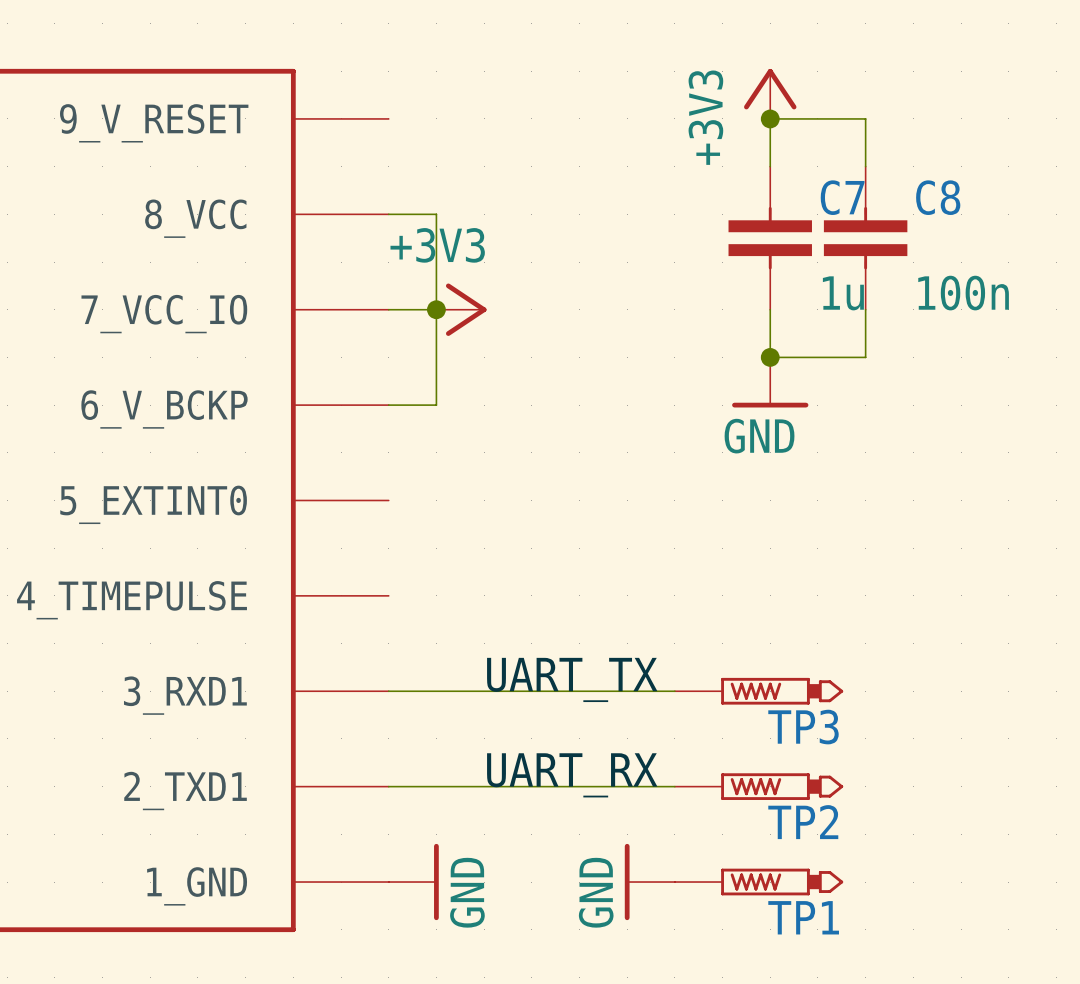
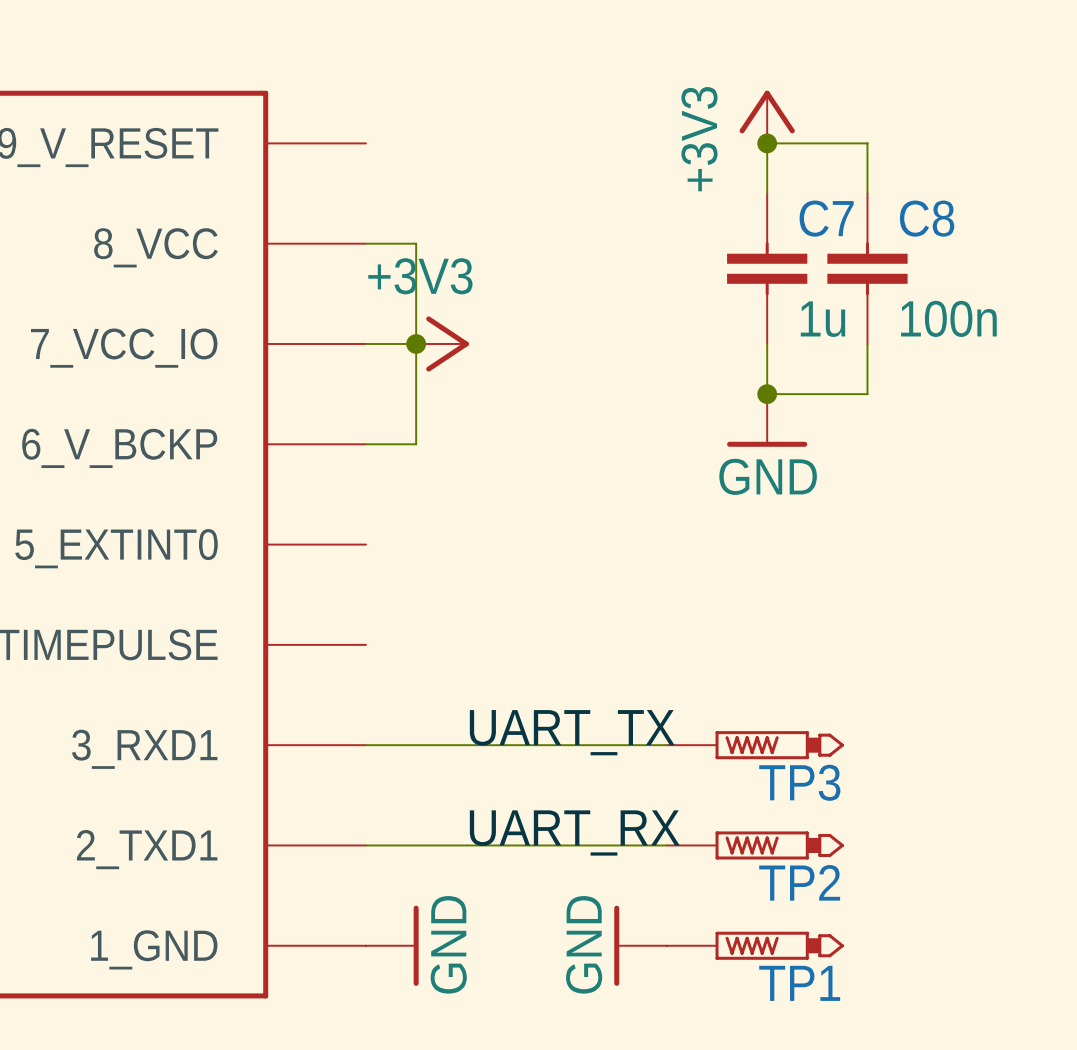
C7 symbol: [728, 166, 812, 310] -> [727, 193, 808, 344]
C8 symbol: [823, 166, 908, 310] -> [827, 193, 908, 344]
C7 name position: C7 (842, 197) -> C7 (826, 218)
C8 name position: C8 (938, 197) -> C8 (927, 218)
C7 value position: 1u (843, 293) -> 1u (823, 319)
C8 value position: 100n (963, 293) -> 100n (948, 318)

